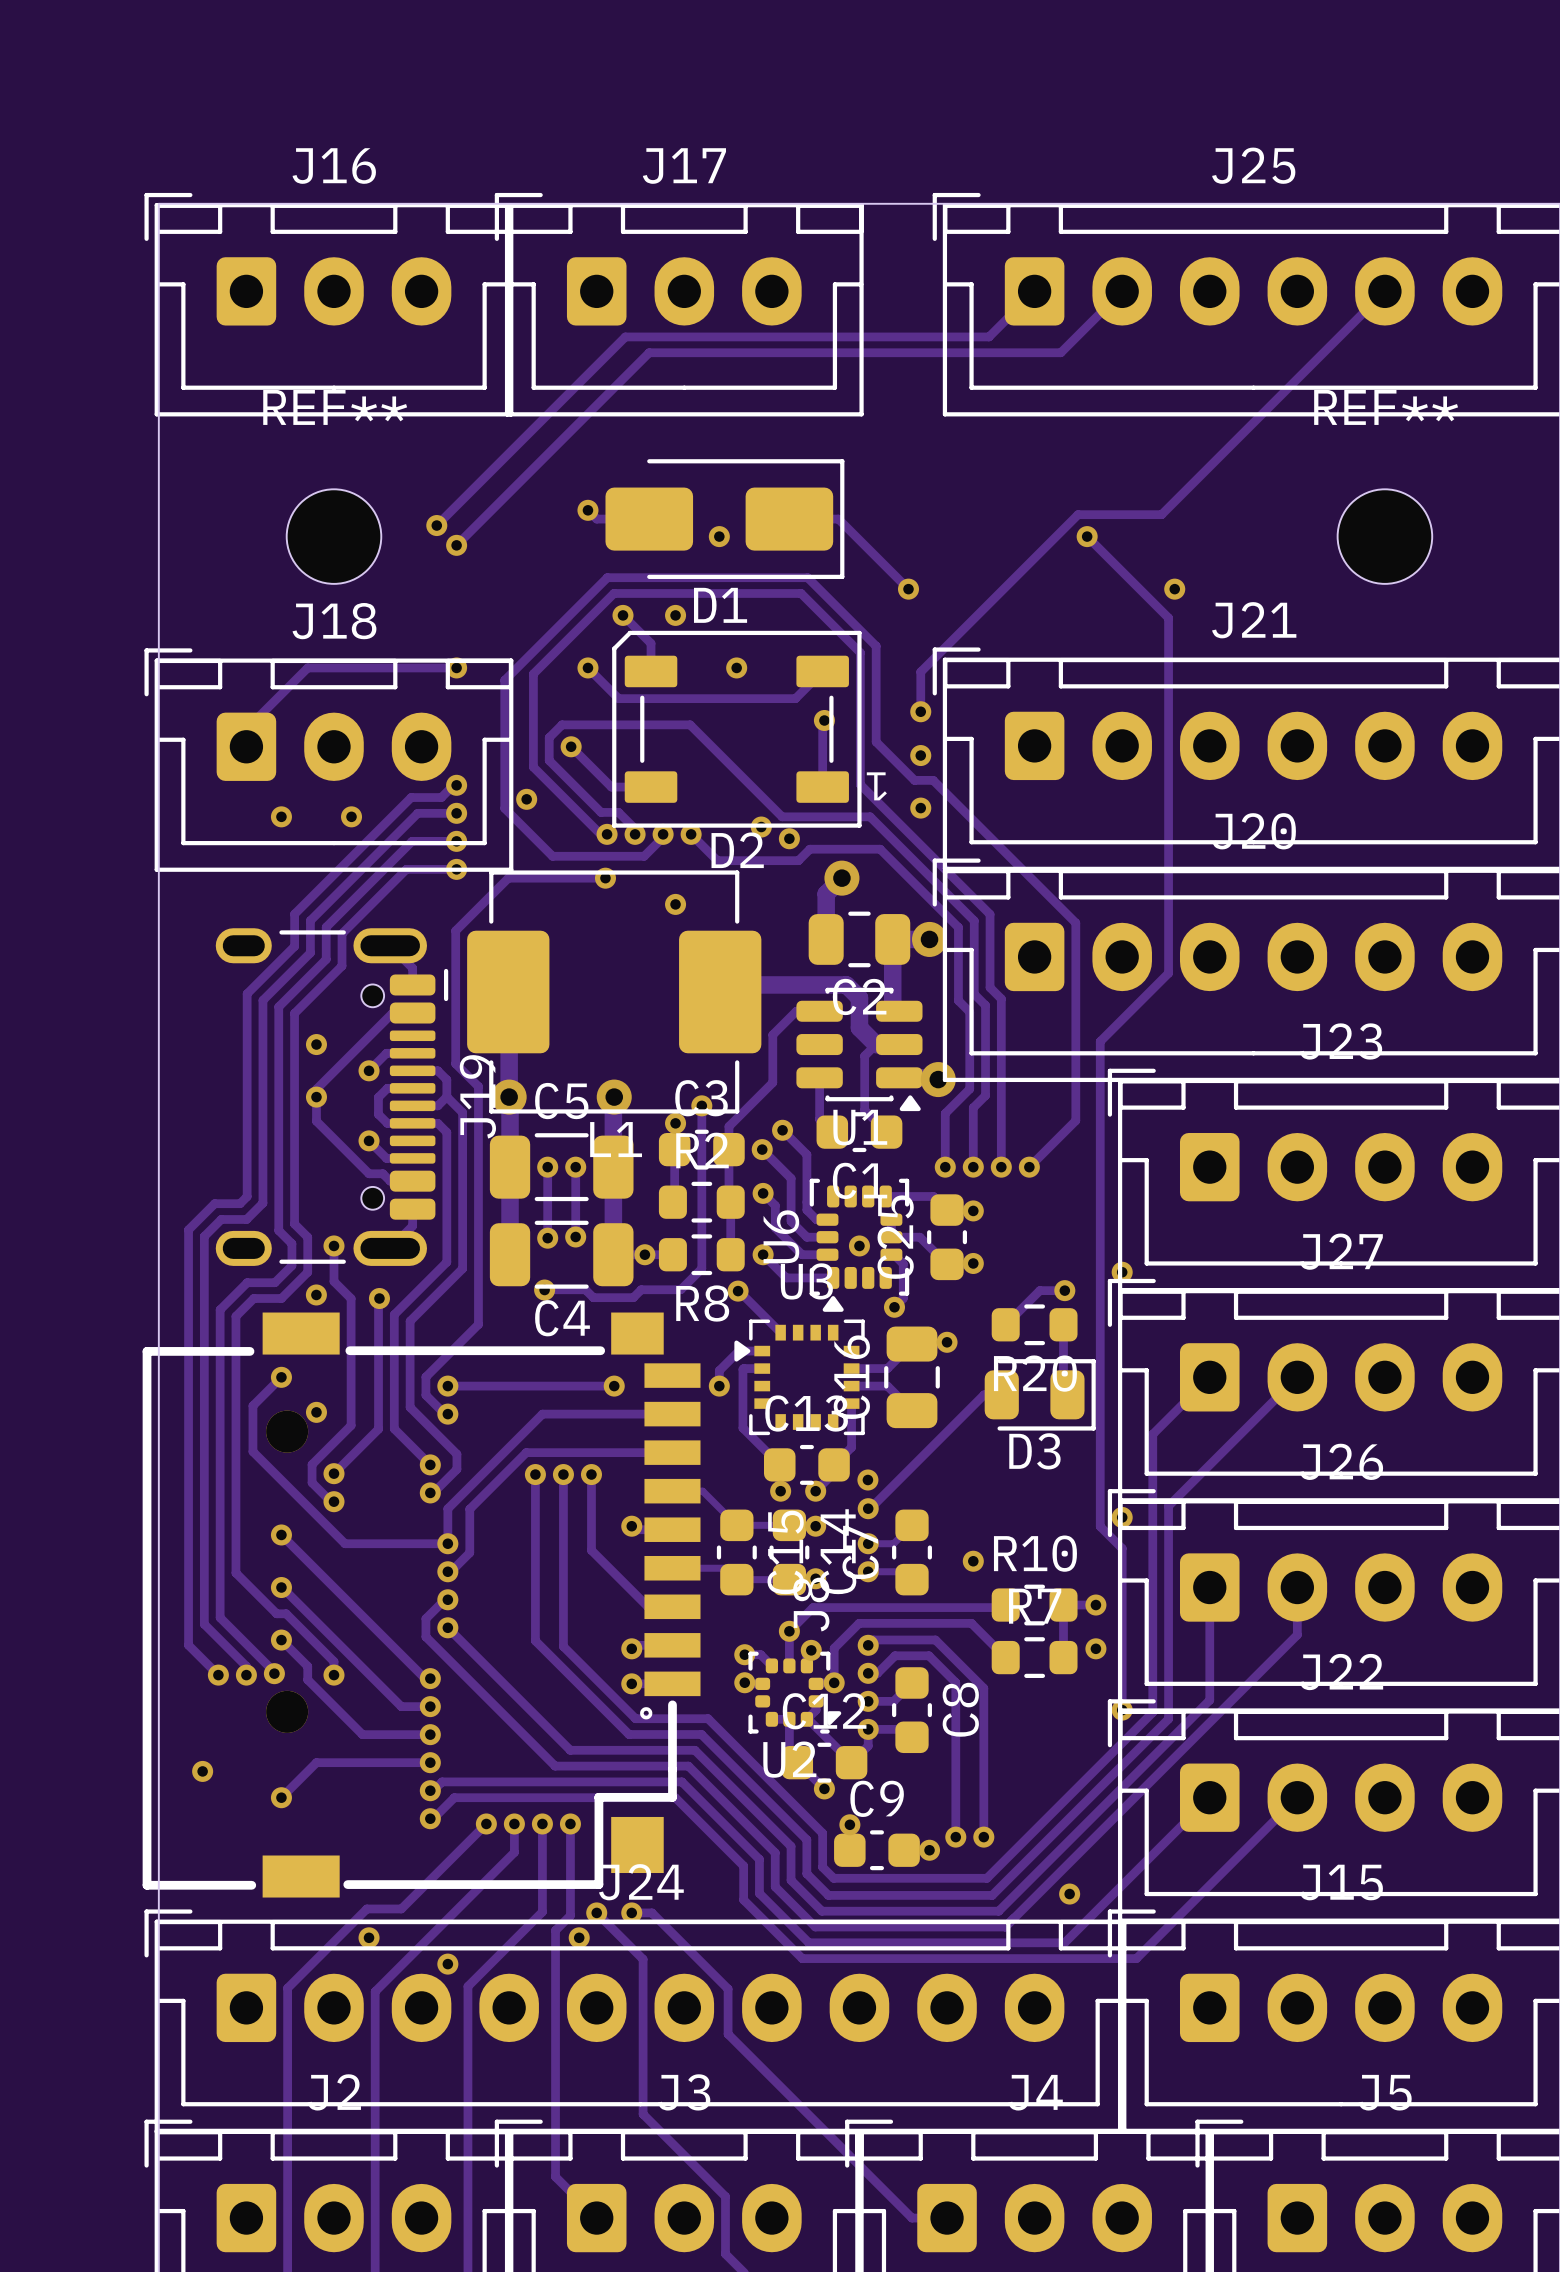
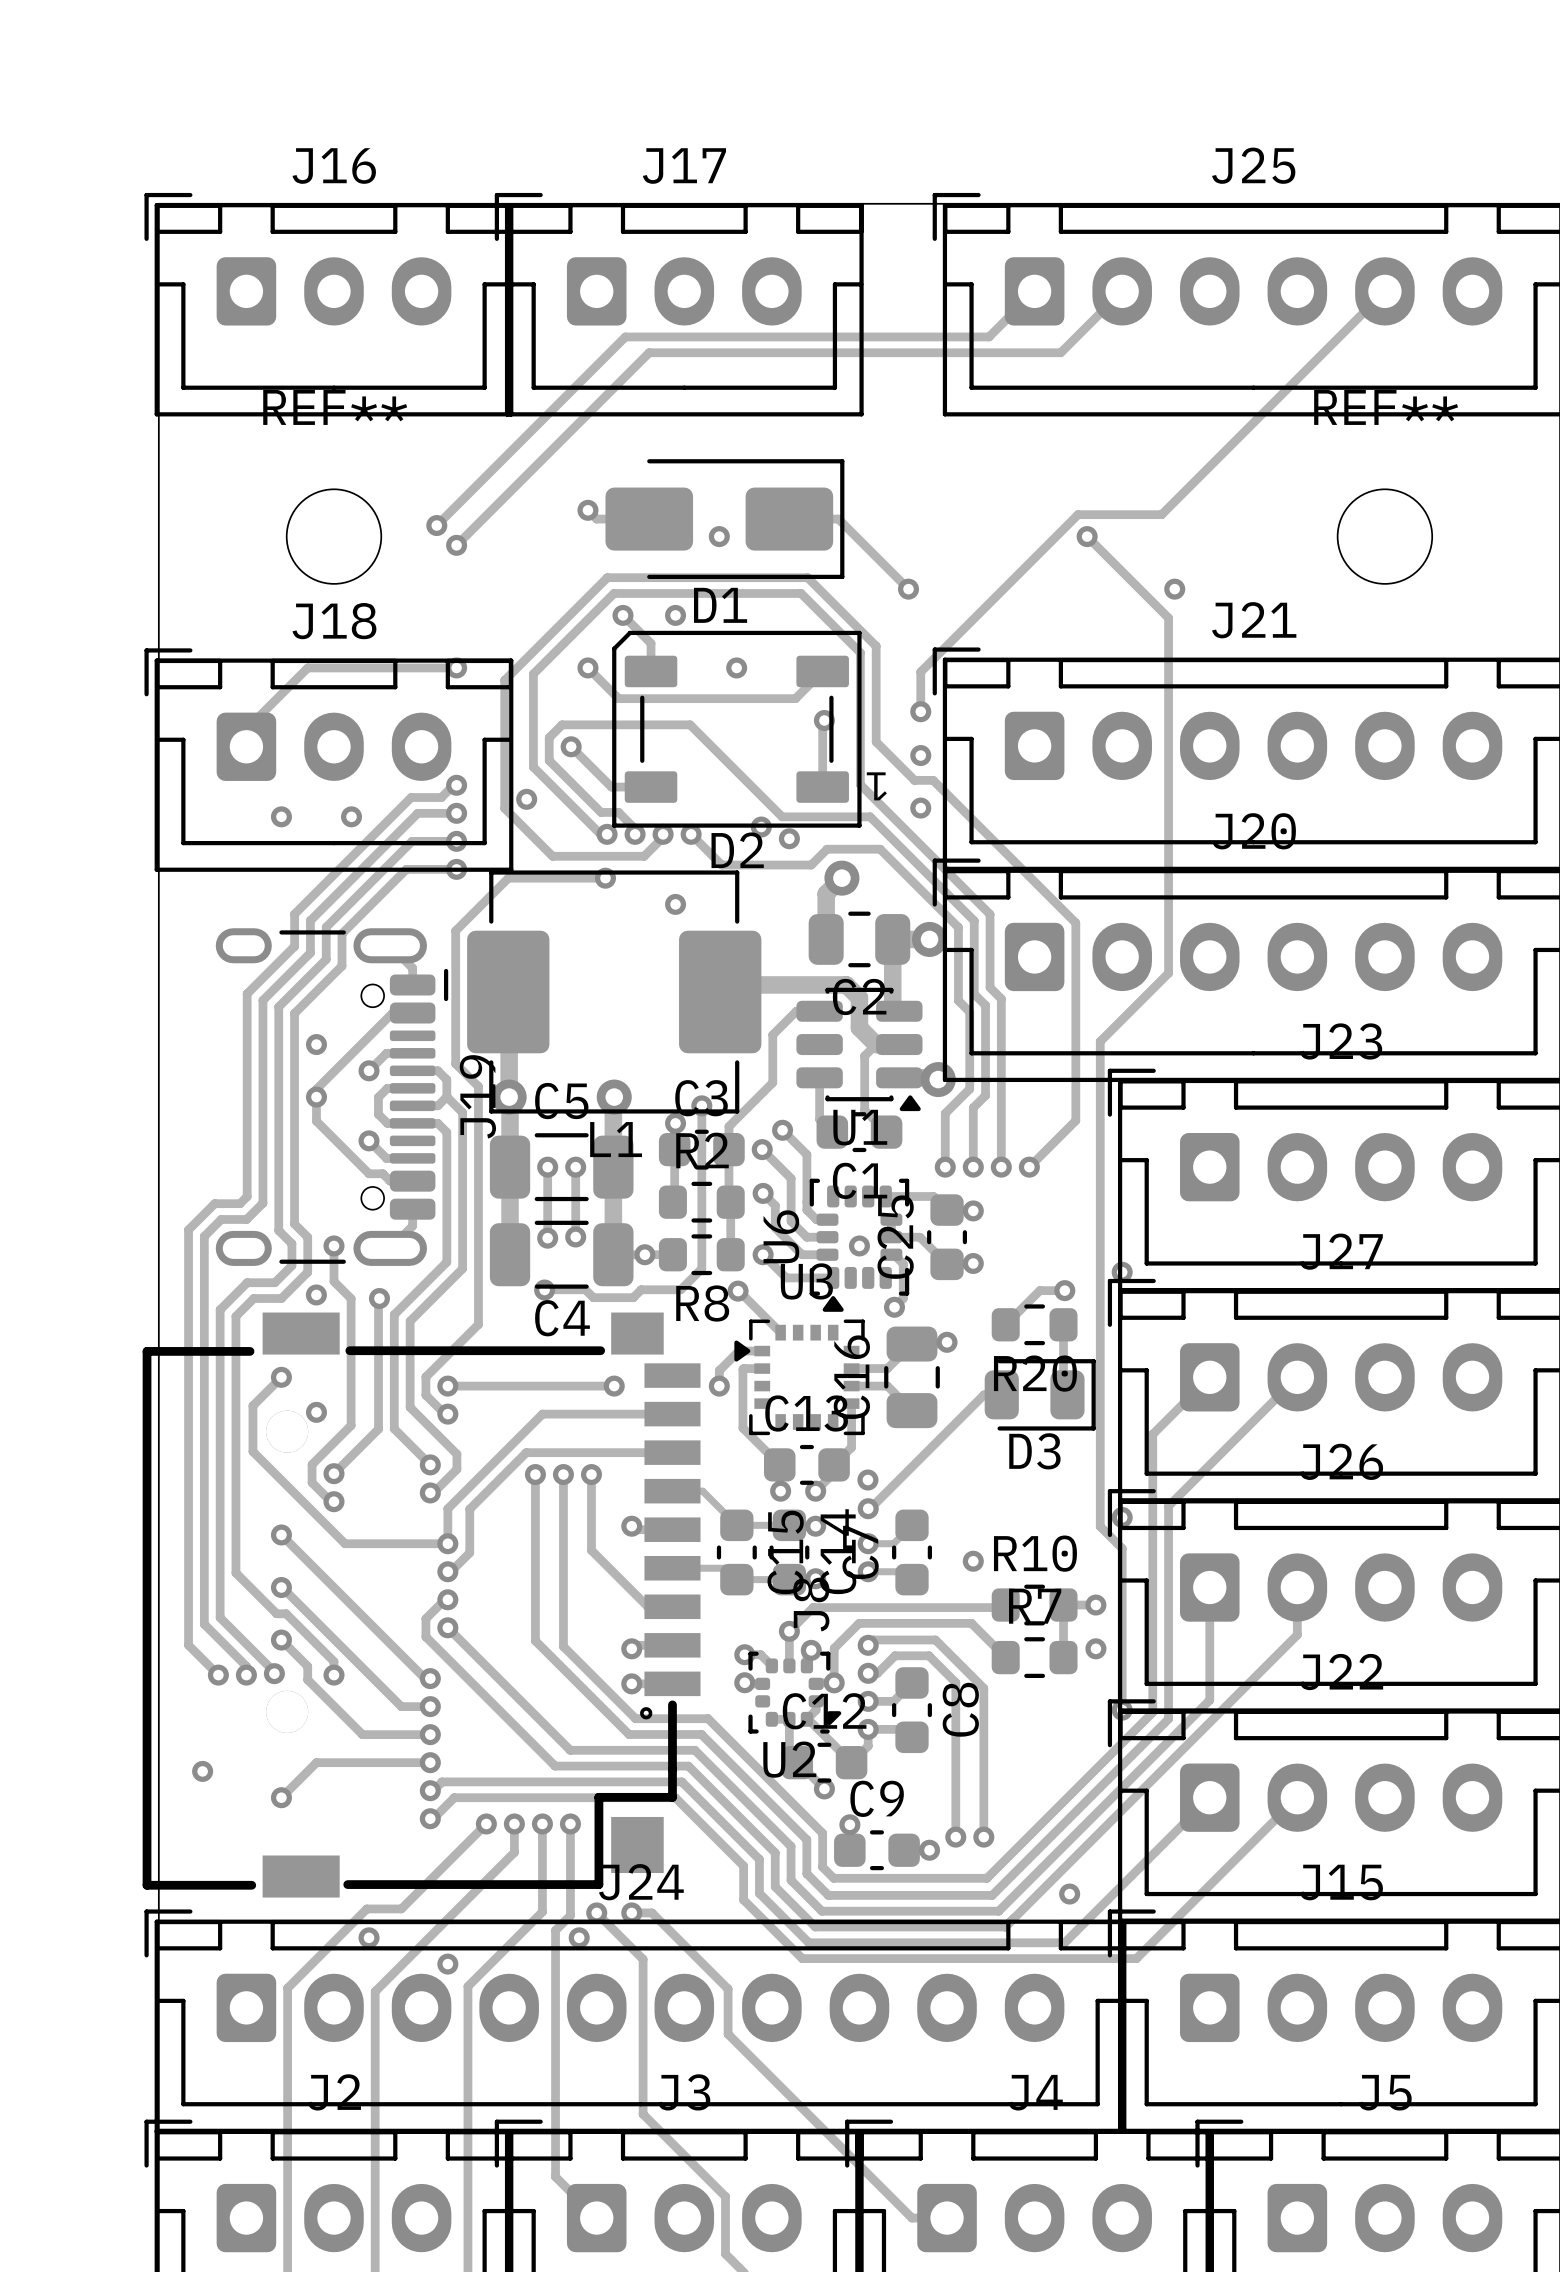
track: (827, 849) (809, 849) (798, 860) (717, 860) -> (827, 849) (811, 865) (721, 865) (717, 860)

